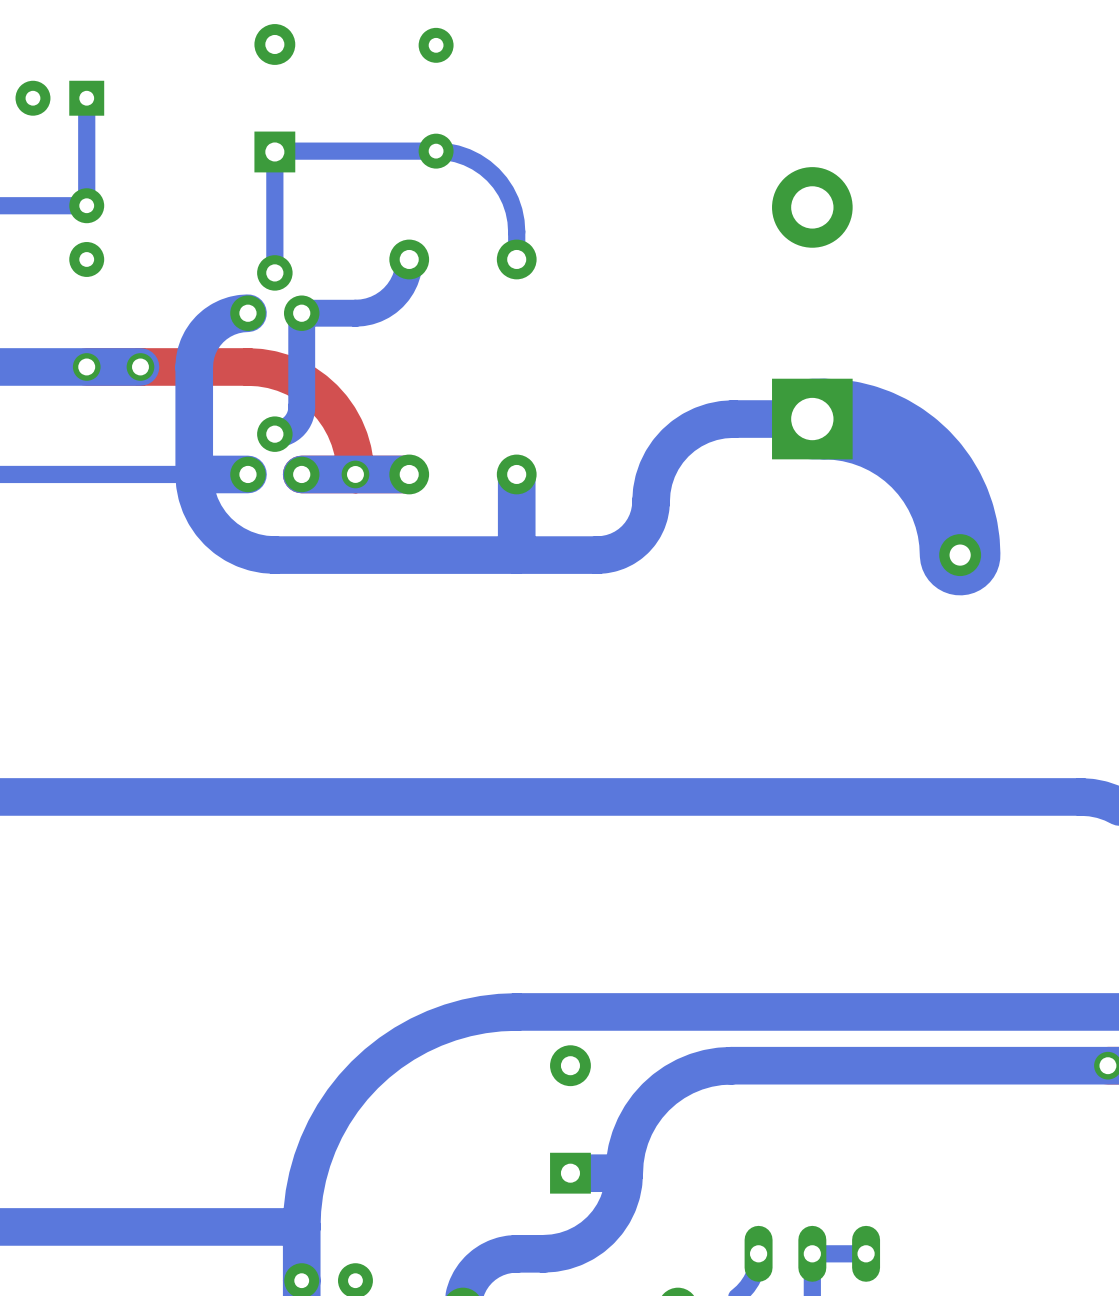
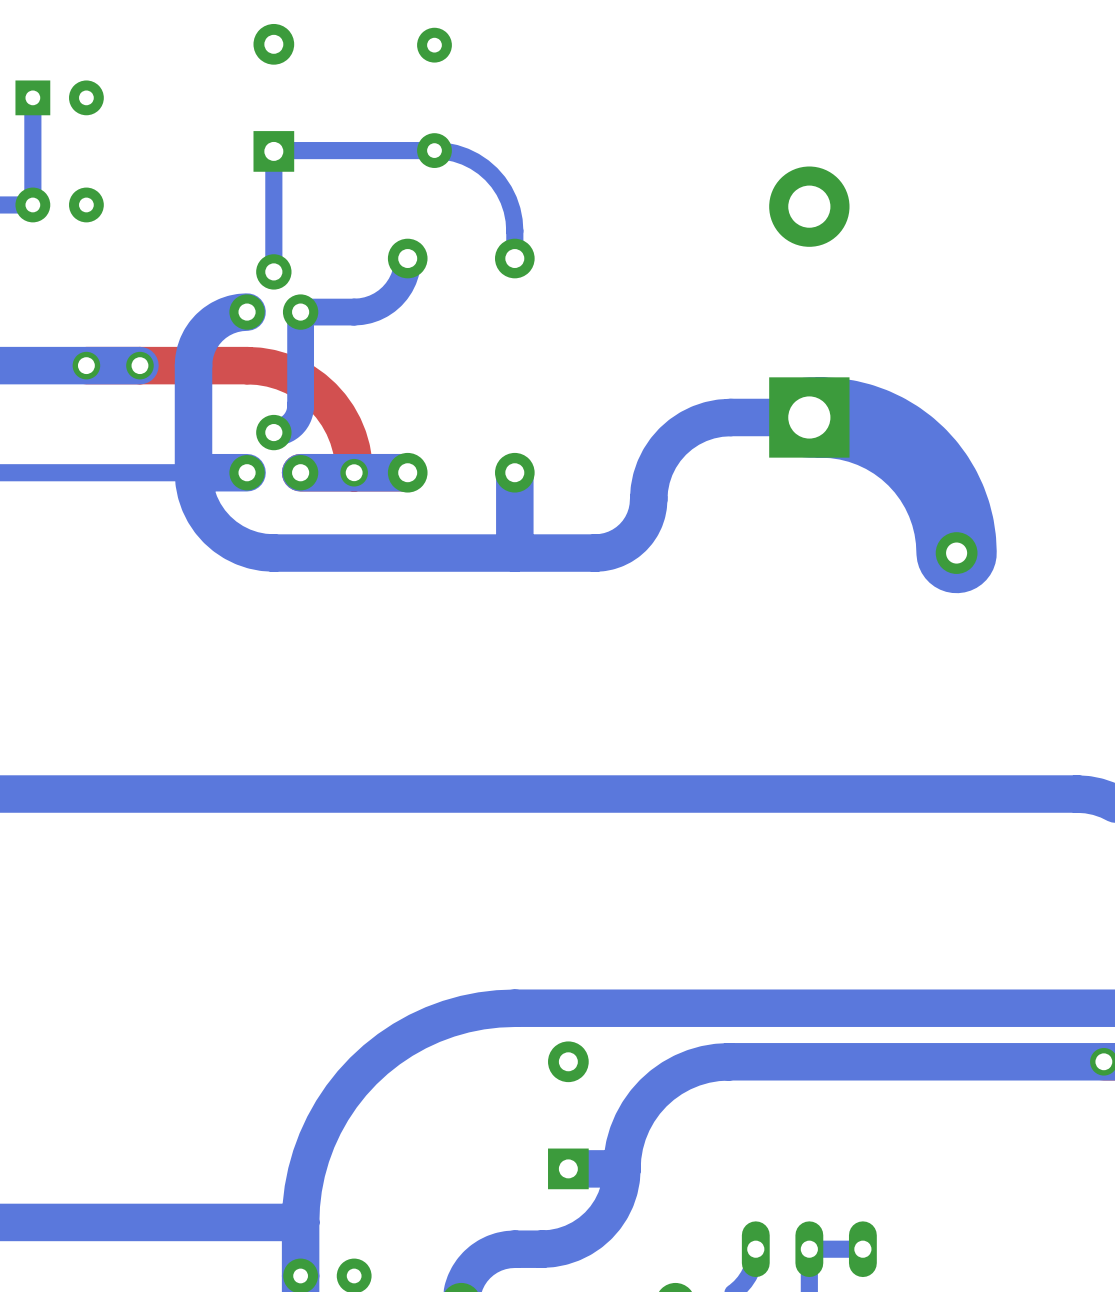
part rotation: 0° (59, 98) -> 180° (59, 97)
bottom track: (86, 98) (86, 205) (32, 205) -> (32, 97) (32, 204)
part rotation: 0° (86, 232) -> 90° clockwise (59, 204)

